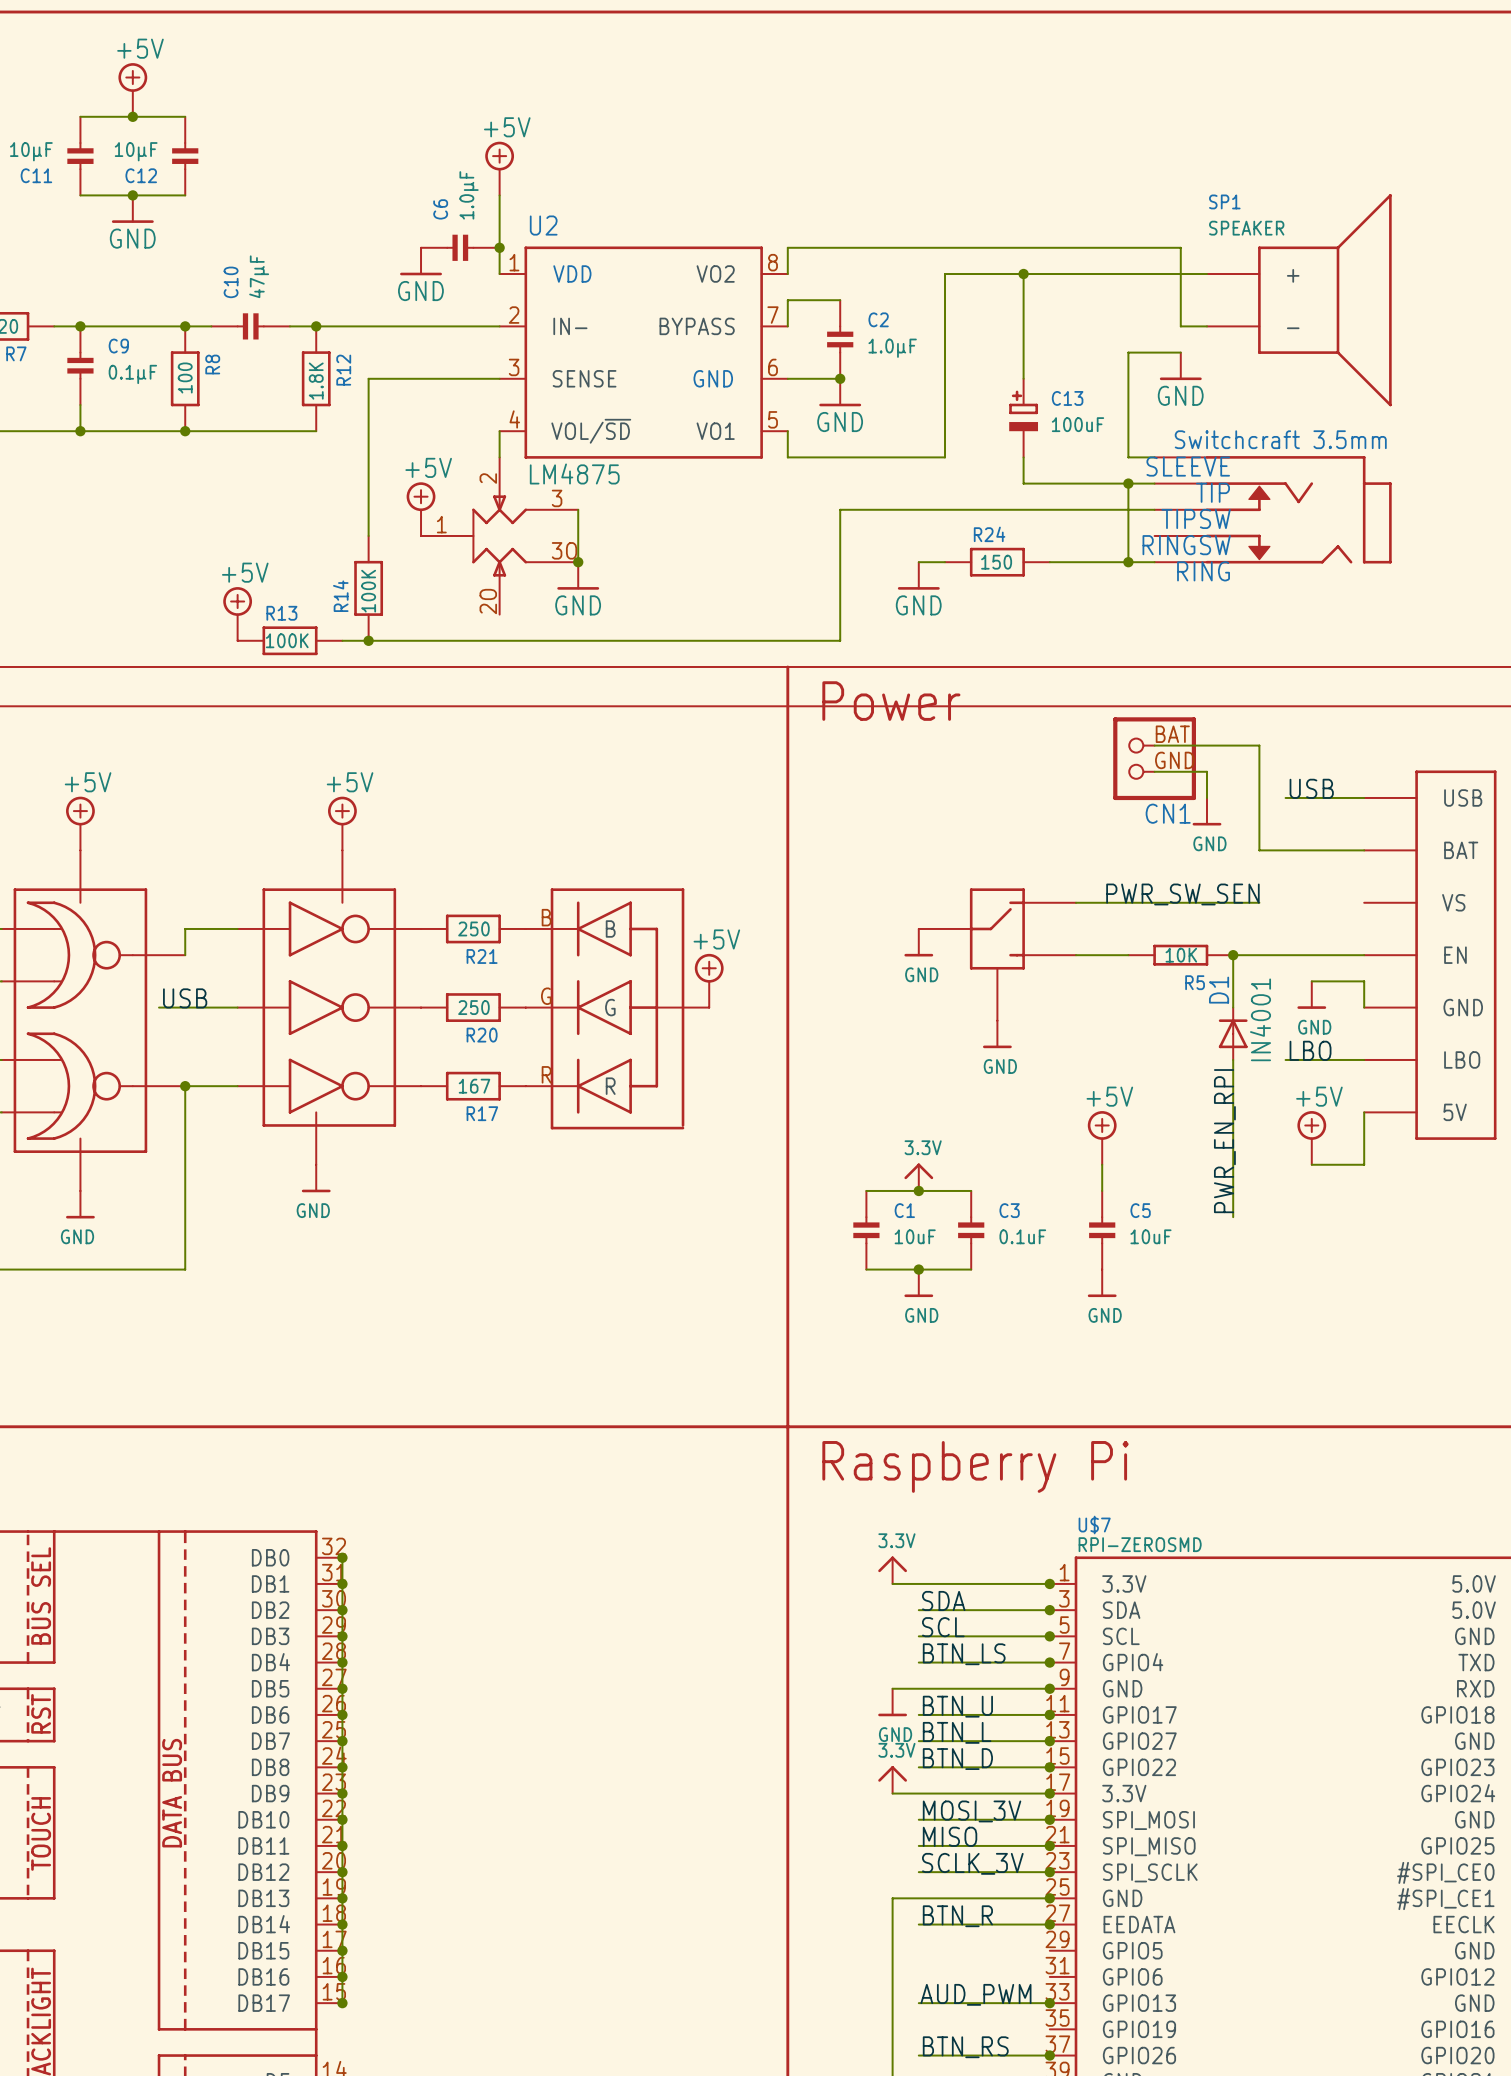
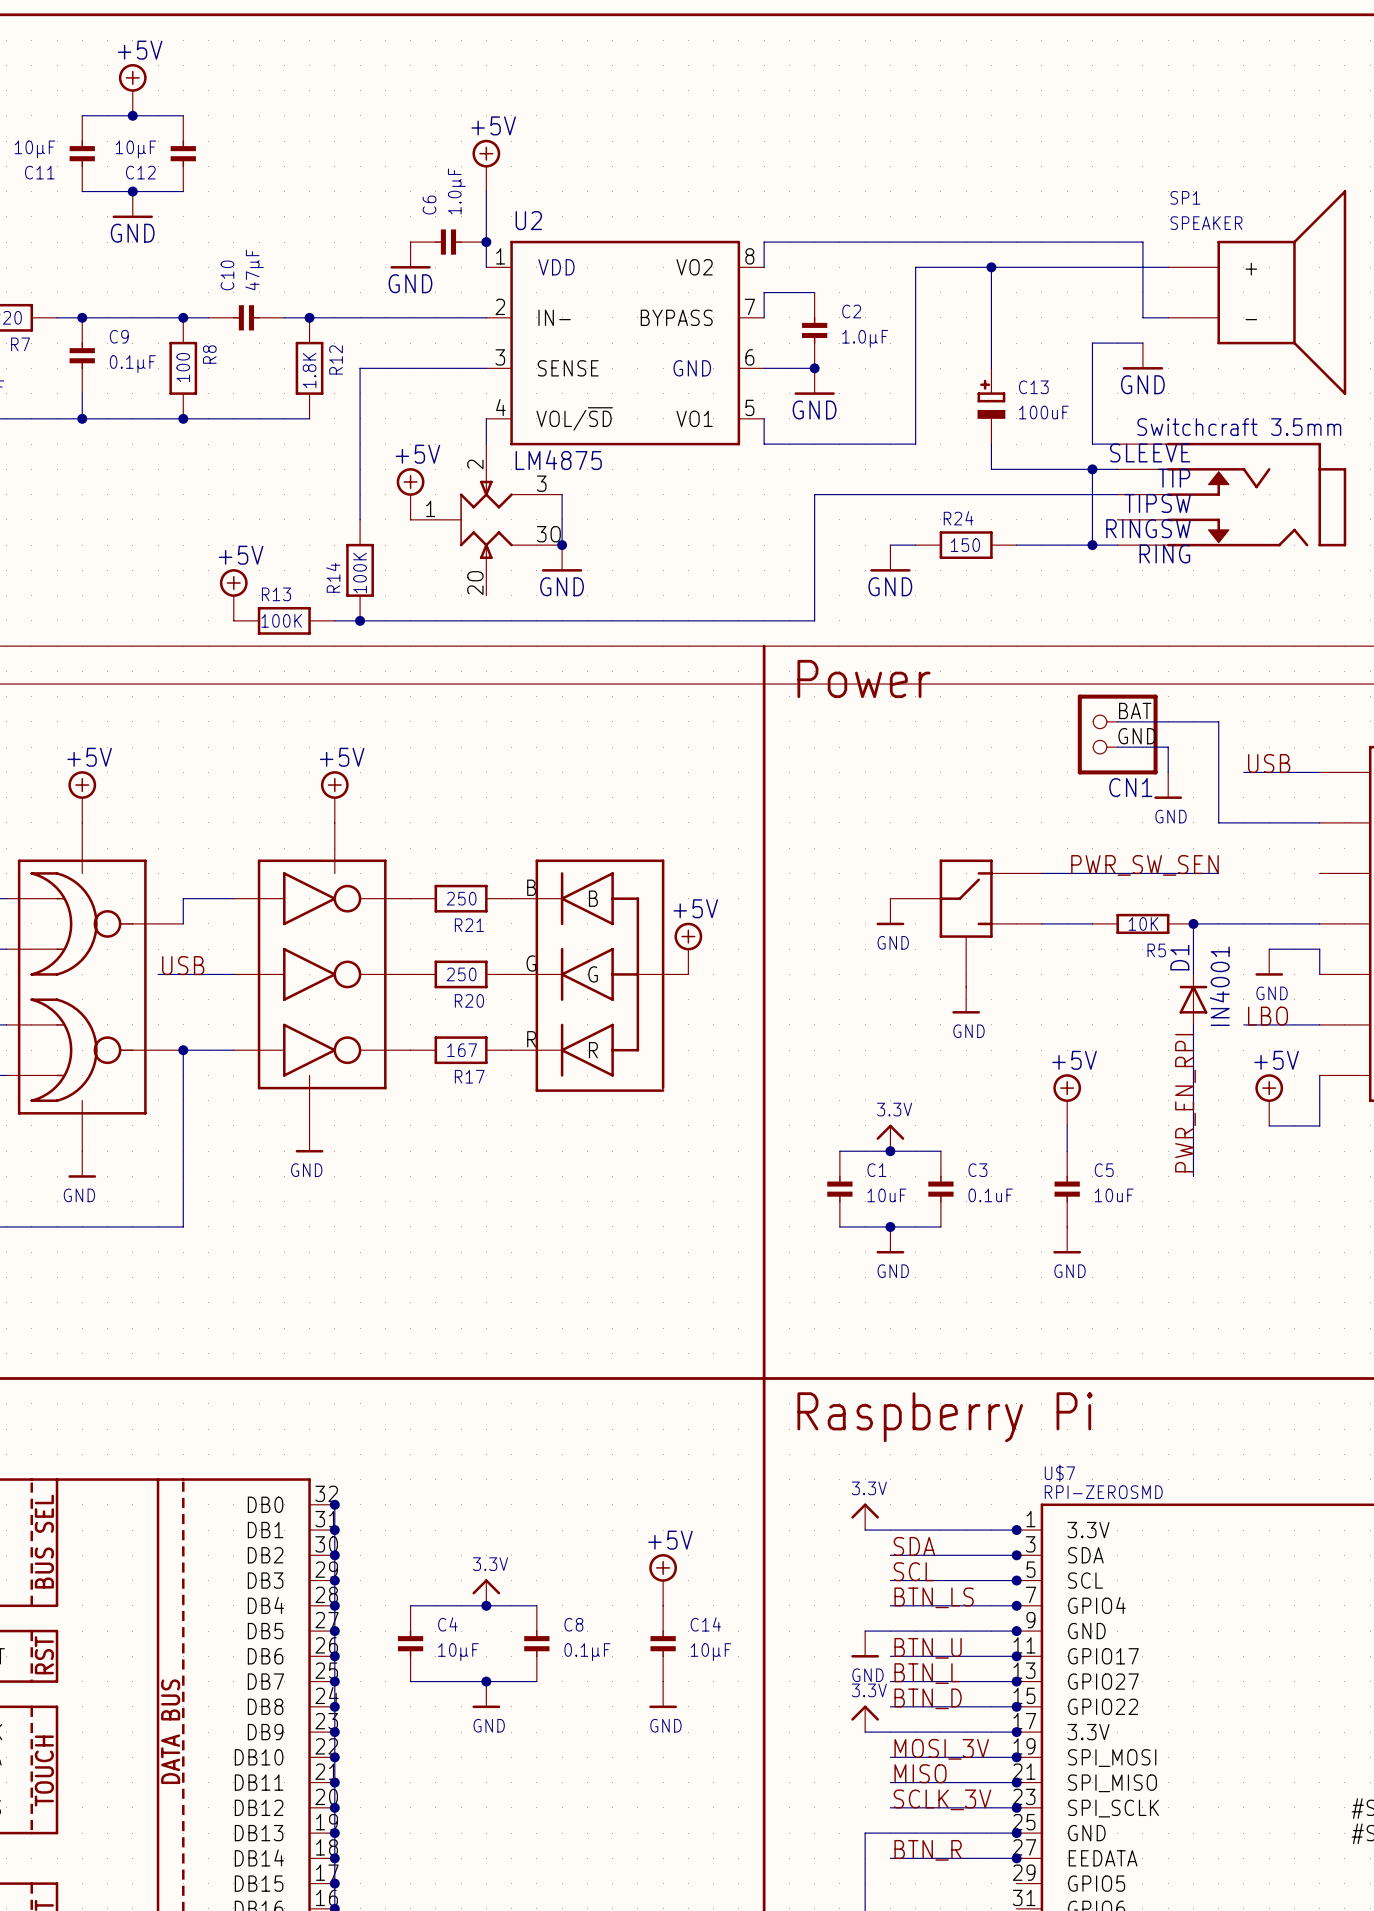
power symbol: none -> +5V (663, 1579)
power symbol: none -> 3.3V (486, 1592)
wire: none -> (410, 1605) (536, 1605)
junction: none -> (486, 1605)
C4: none -> 10μF (410, 1643)
C8: none -> 0.1μF (536, 1643)
C14: none -> 10μF (663, 1643)
wire: none -> (410, 1681) (536, 1681)
junction: none -> (486, 1681)
power symbol: none -> GND (486, 1694)
power symbol: none -> GND (663, 1694)

